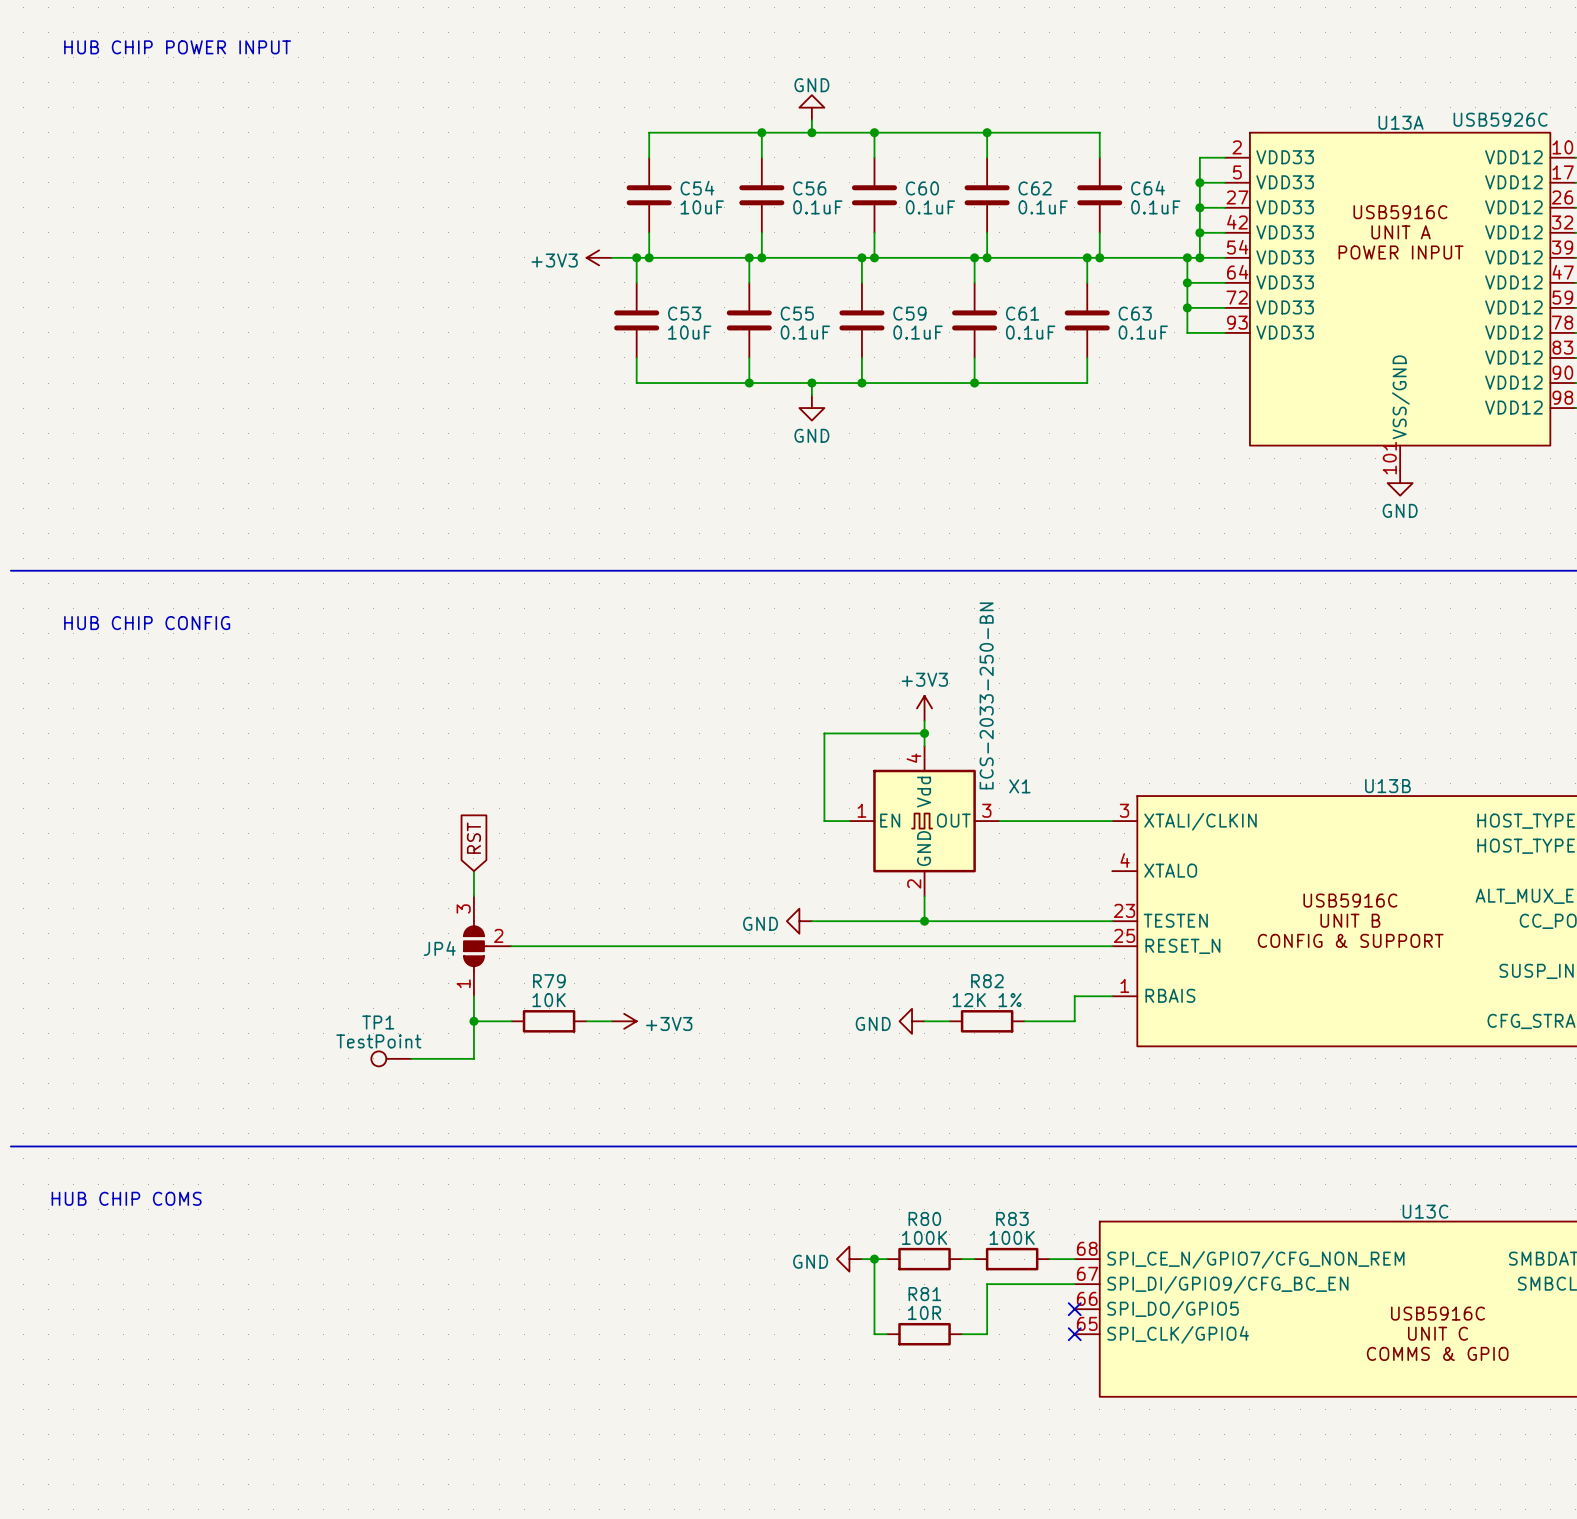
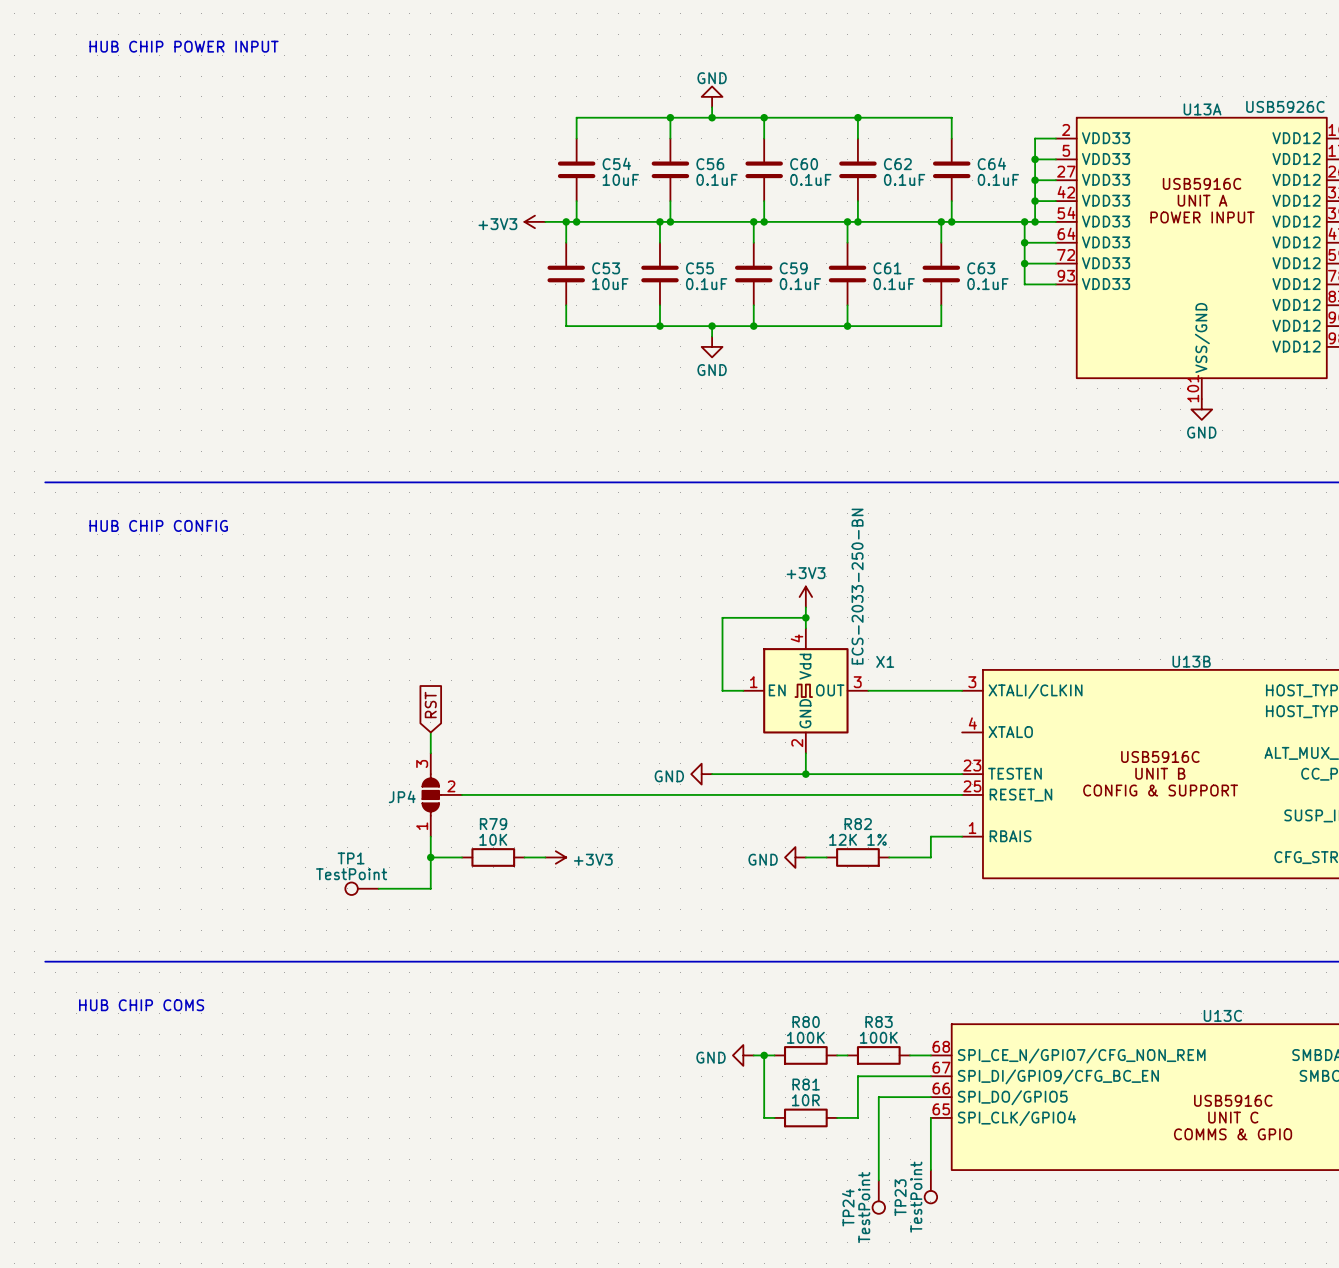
wire: none -> (930, 1097) (878, 1097) (878, 1180)
no-connect mark: (1074, 1309) -> none
wire: none -> (930, 1117) (930, 1170)
no-connect mark: (1074, 1334) -> none
TP23: none -> TestPoint (930, 1186)
TP24: none -> TestPoint (878, 1197)

